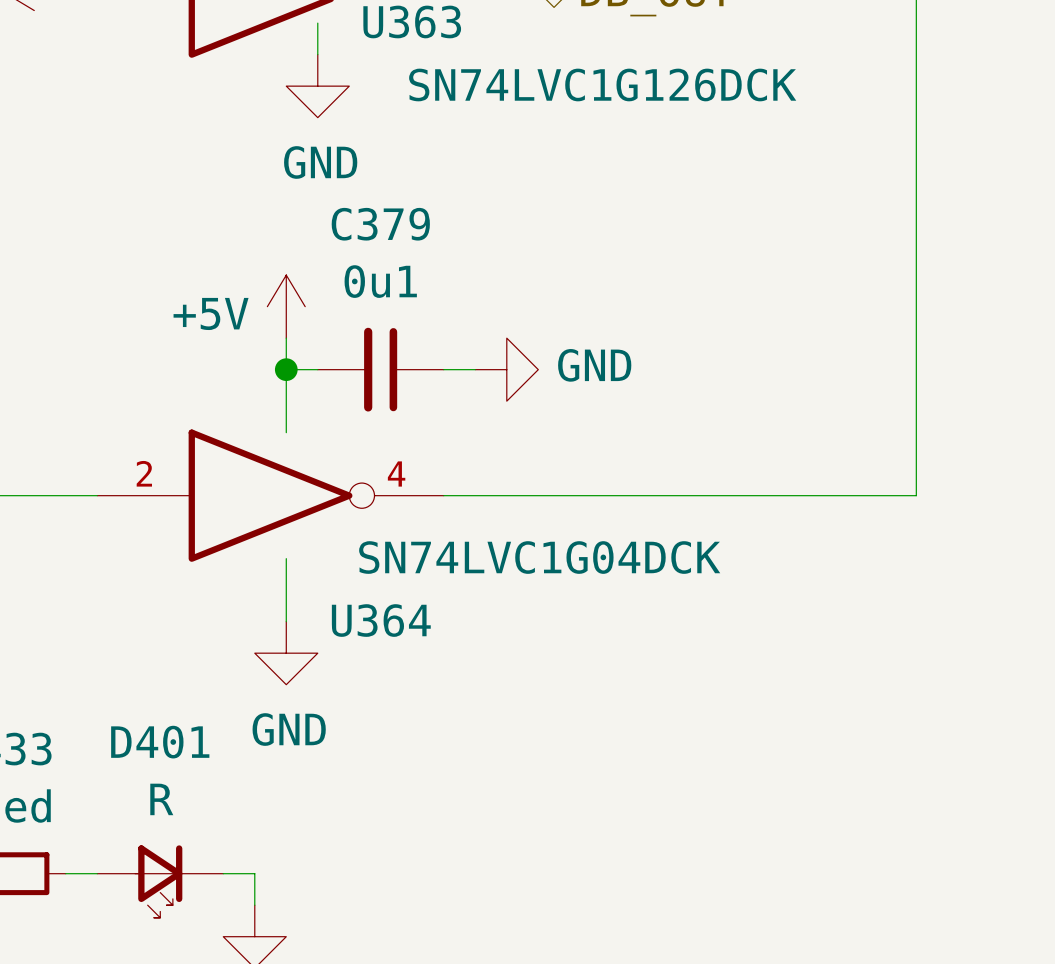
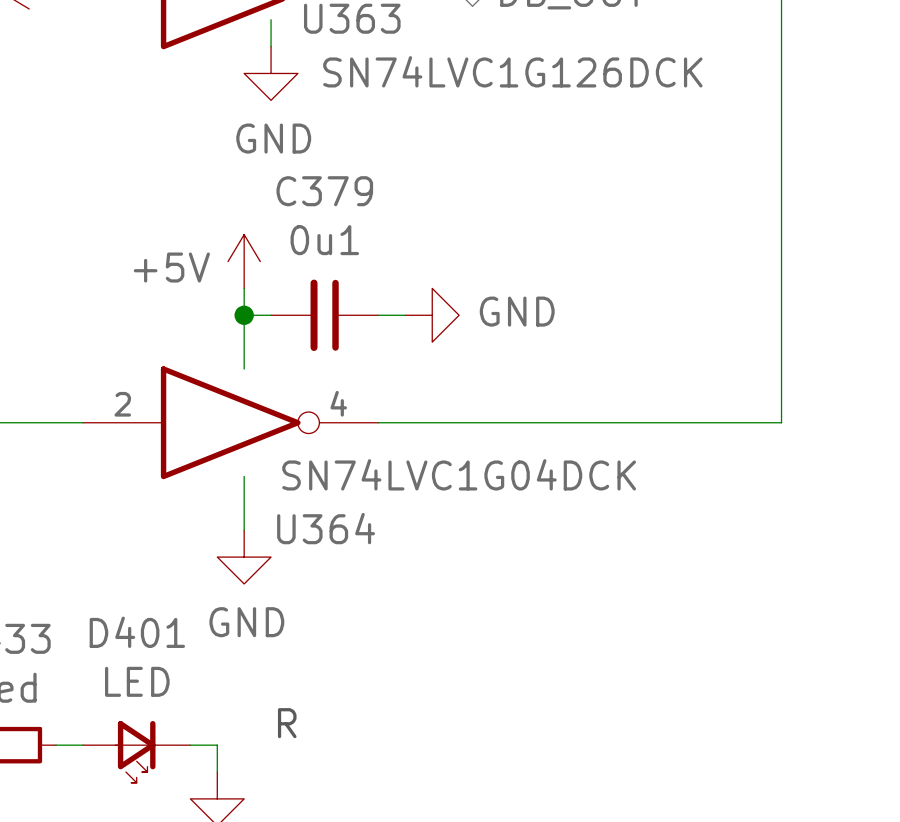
D401 value: R (161, 799) -> LED (137, 681)
text: none -> R (287, 723)

